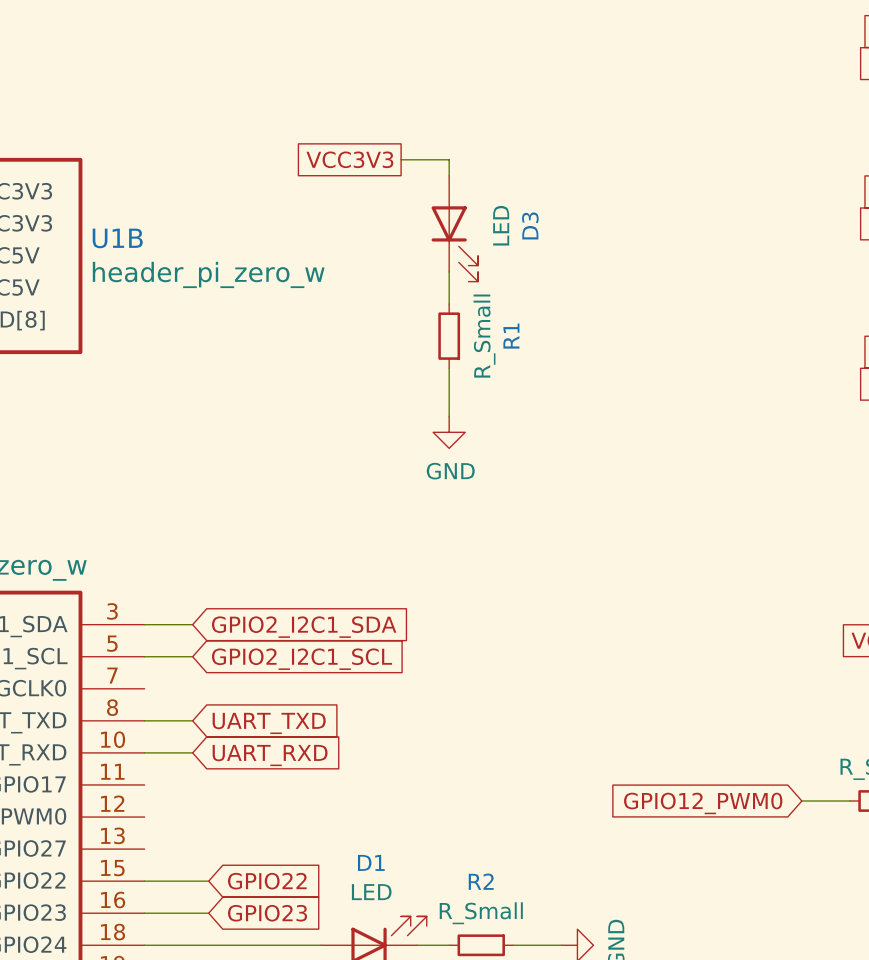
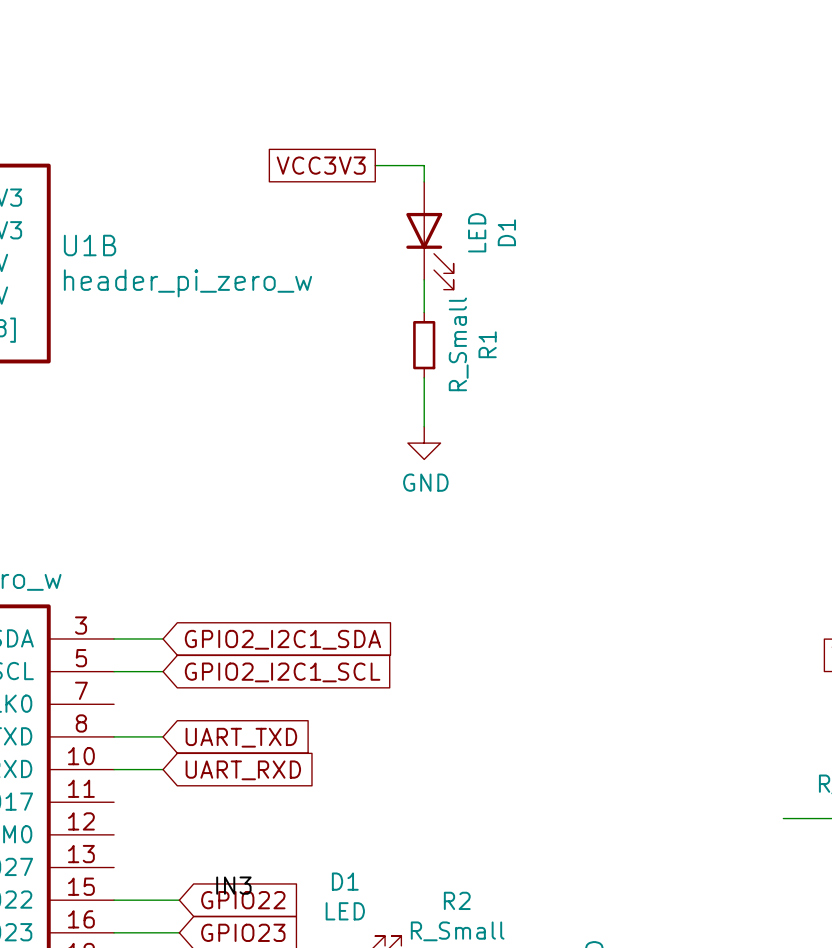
D3 name: D3 (530, 225) -> D1 (506, 232)
global label: GPIO12_PWM0 (703, 803) -> none
label: none -> IN3 (233, 885)

